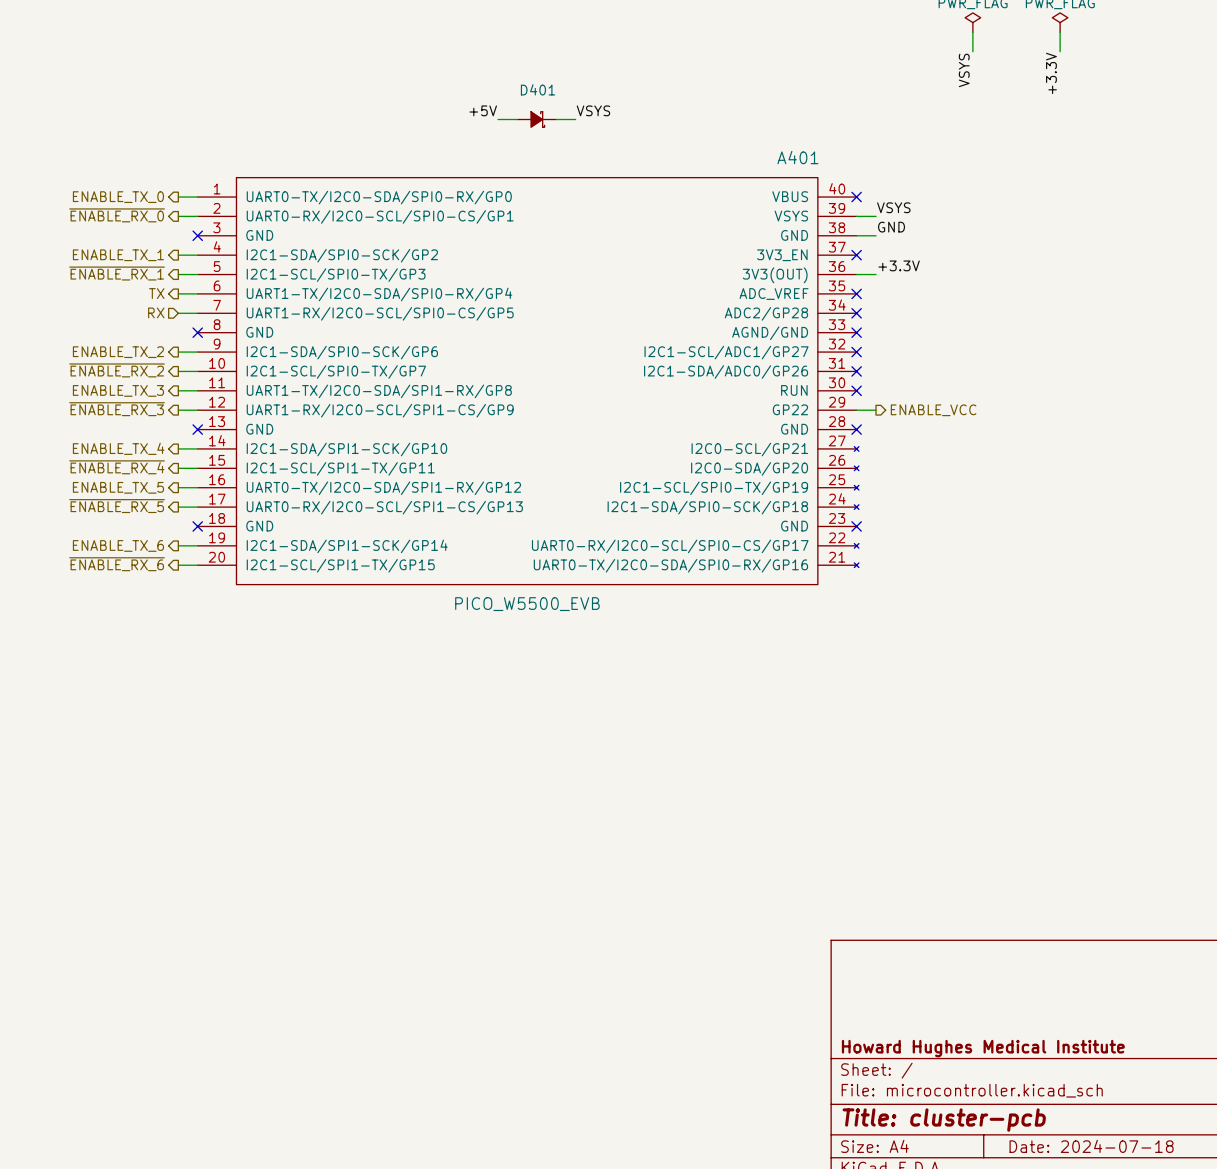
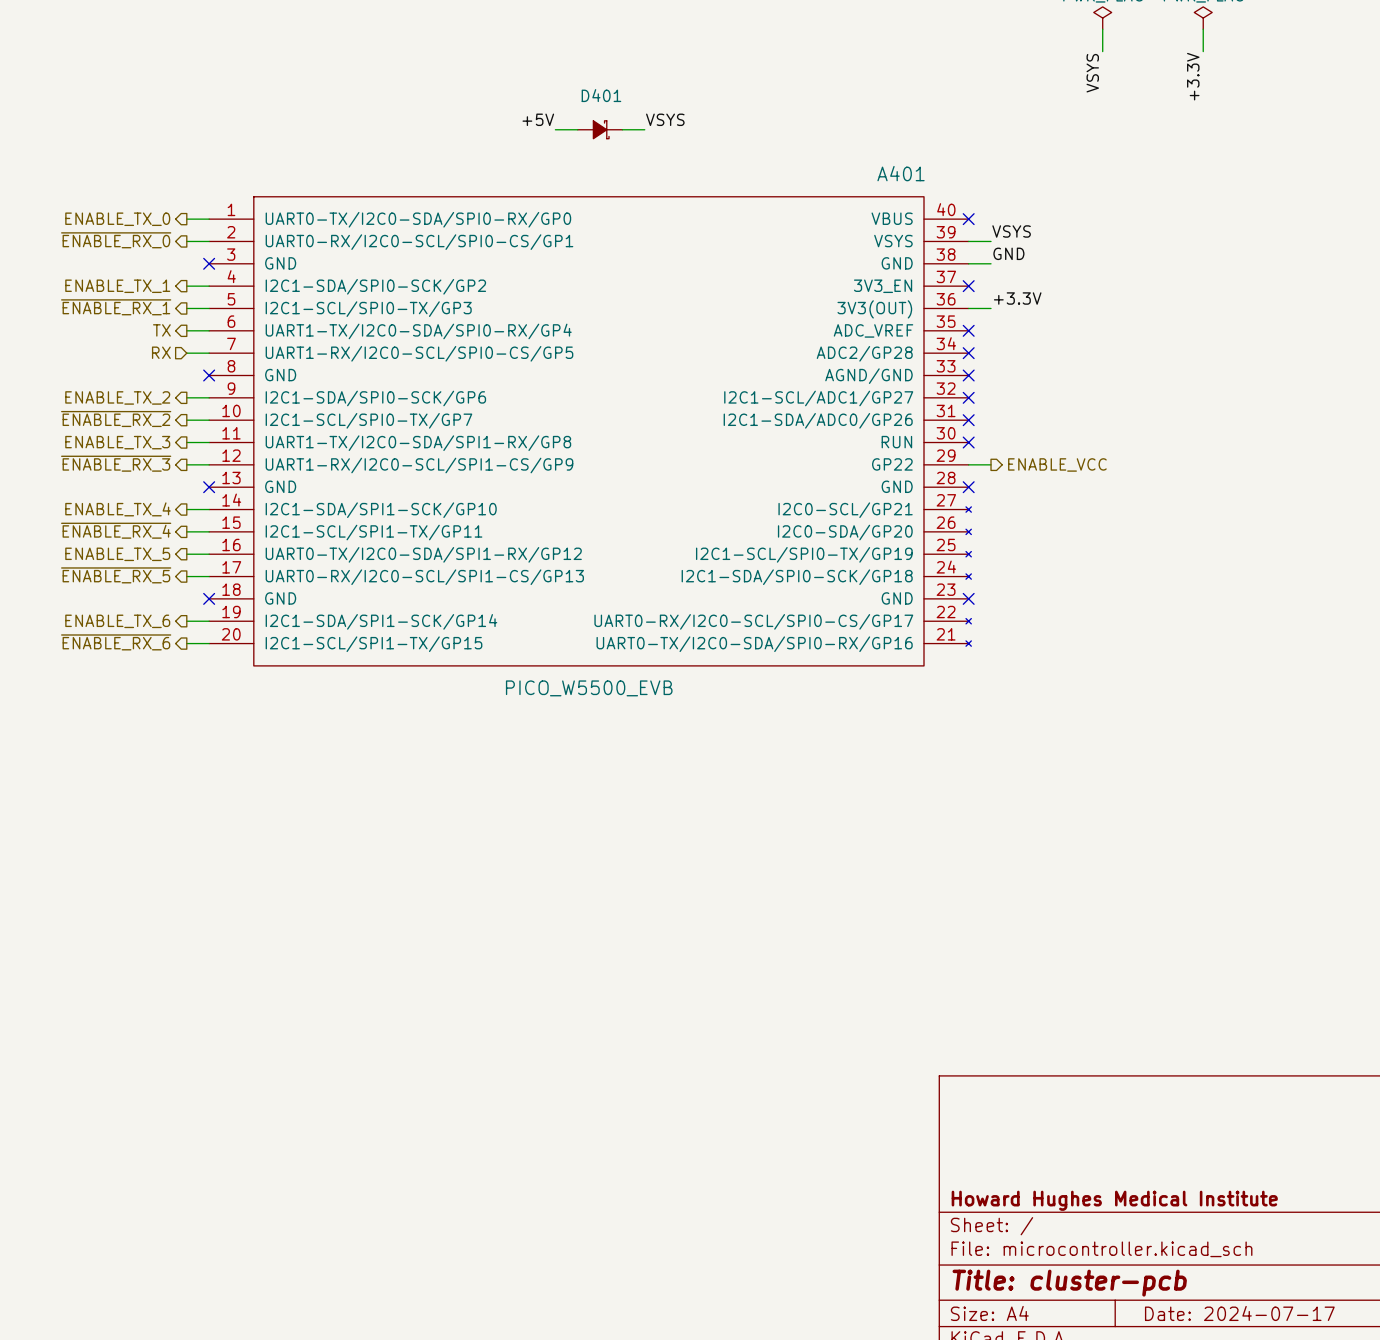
title block: Date: 2024-07-18 (1091, 1146) -> Date: 2024-07-17 (1239, 1313)

